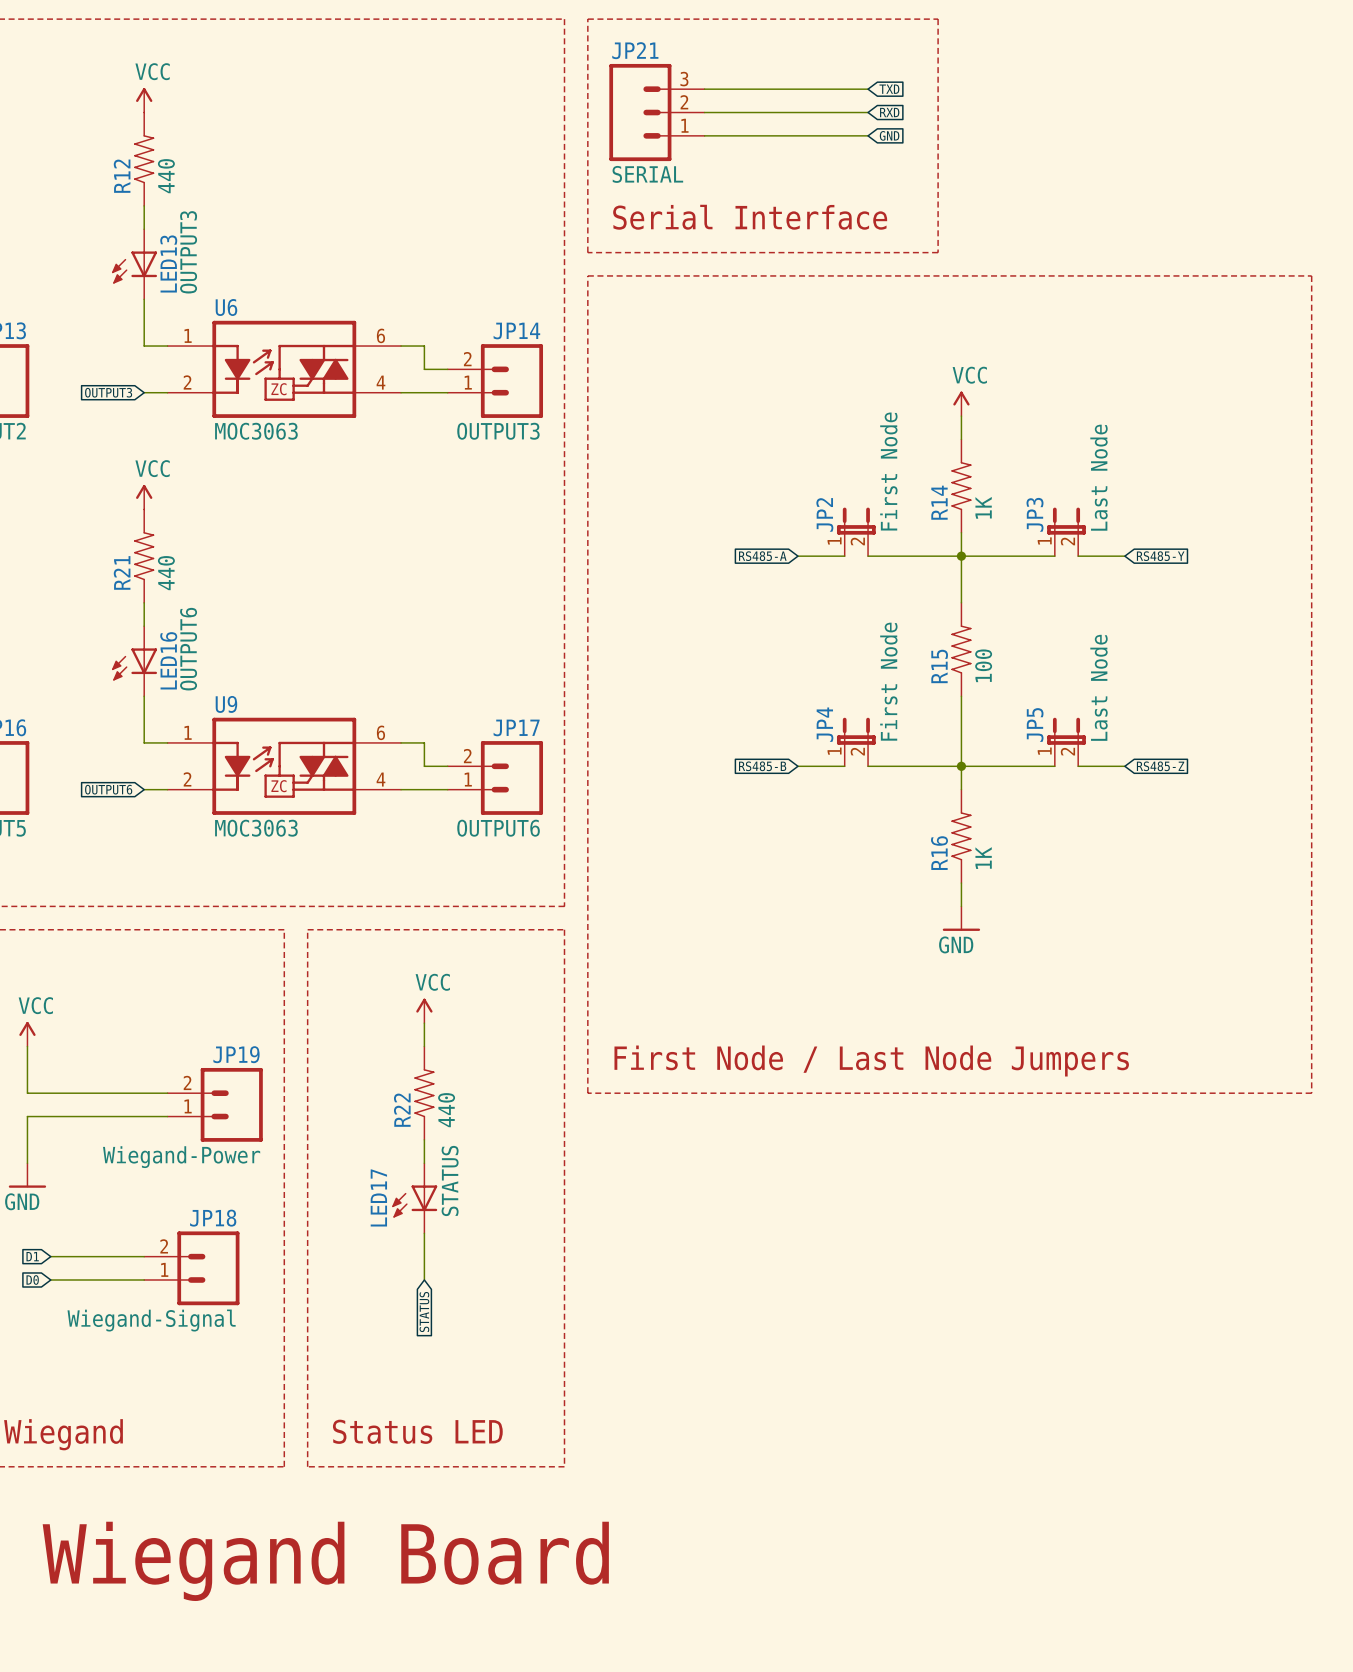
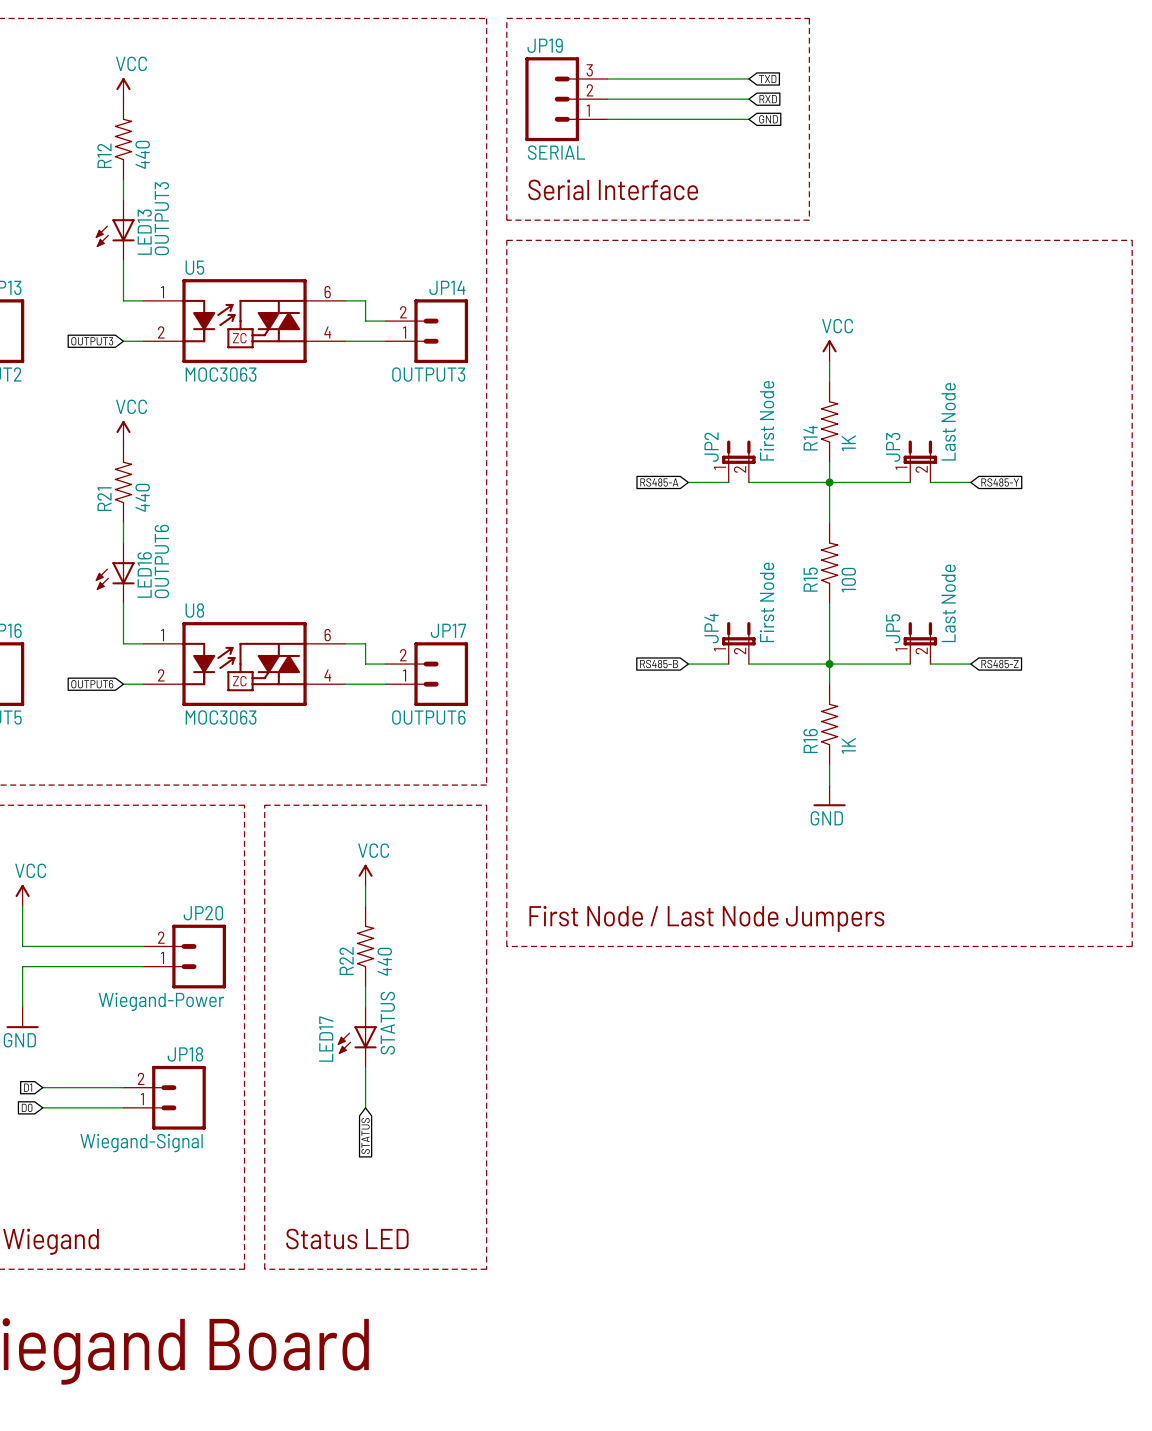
JP21 name: JP21 (635, 50) -> JP19 (545, 45)
U6 name: U6 (226, 307) -> U5 (194, 267)
U9 name: U9 (226, 704) -> U8 (194, 610)
JP19 name: JP19 (236, 1054) -> JP20 (203, 913)

